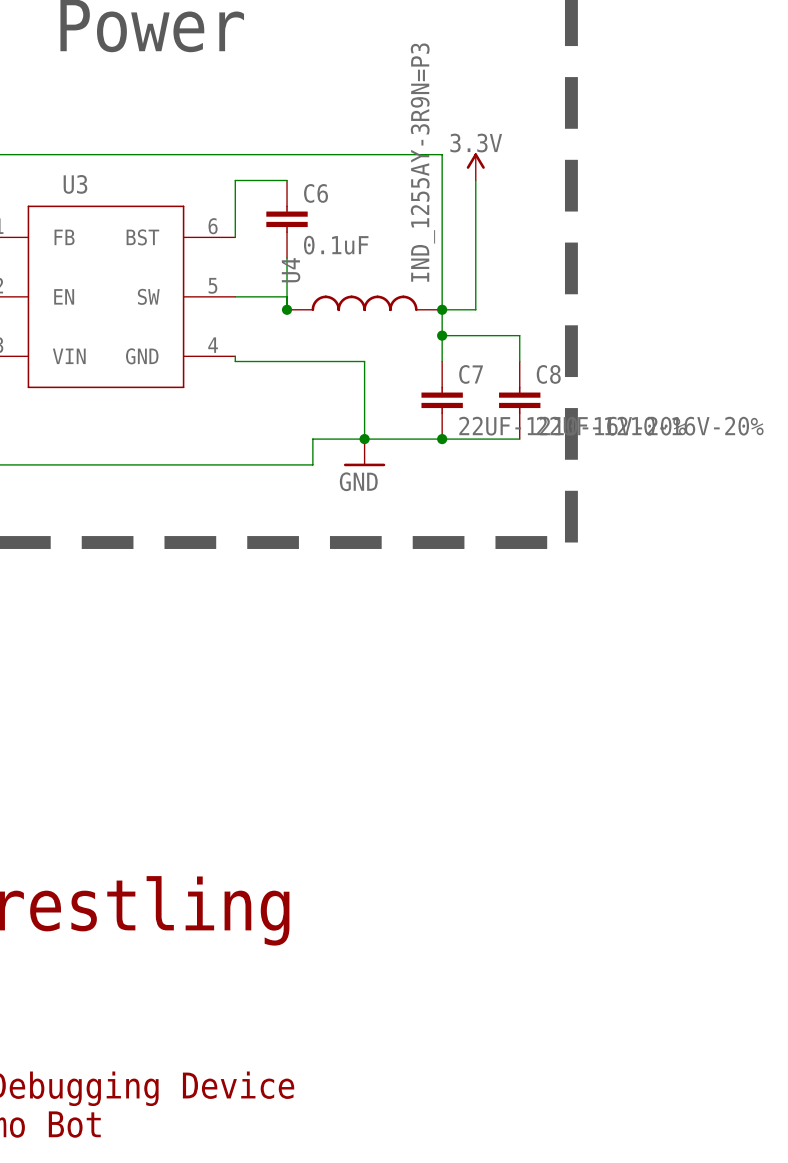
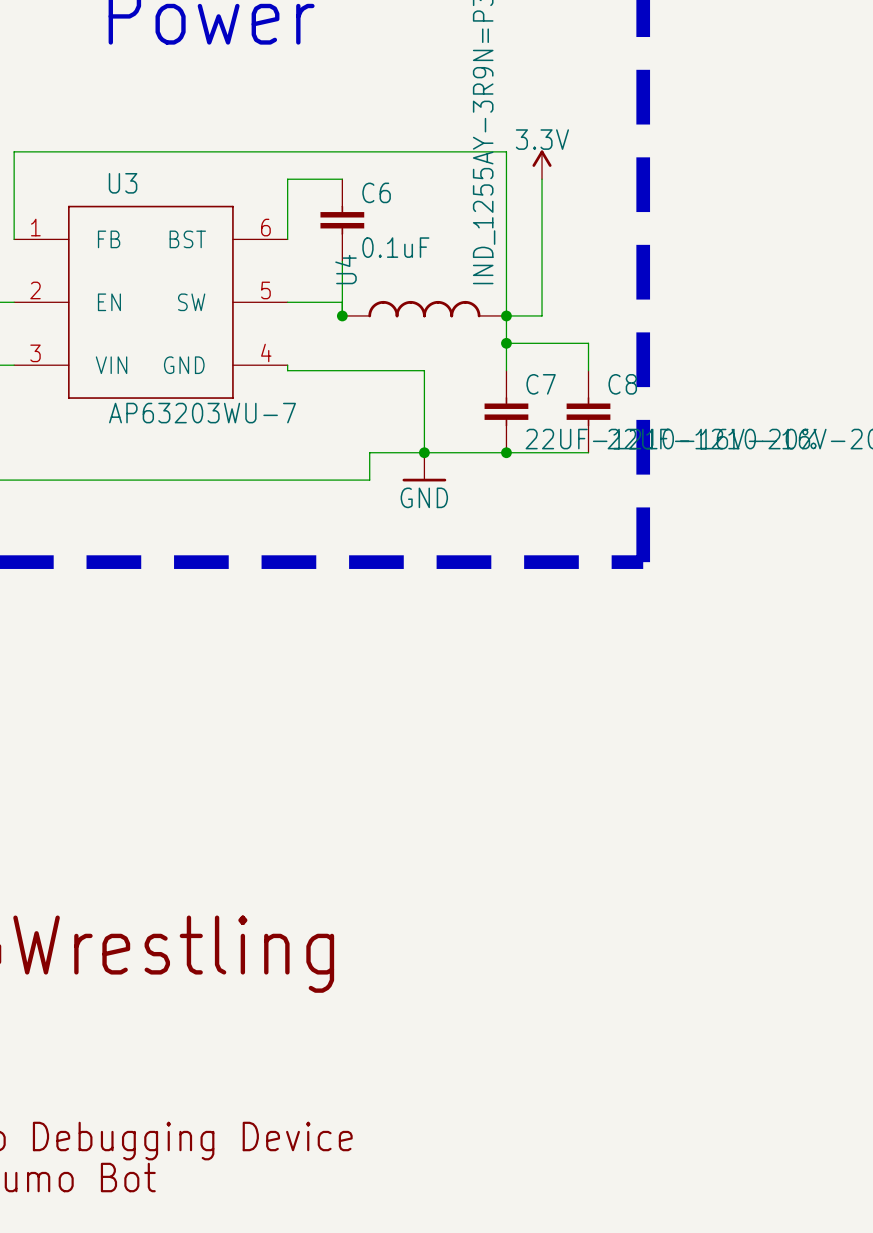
U3 value: none -> AP63203WU-7 (202, 413)

